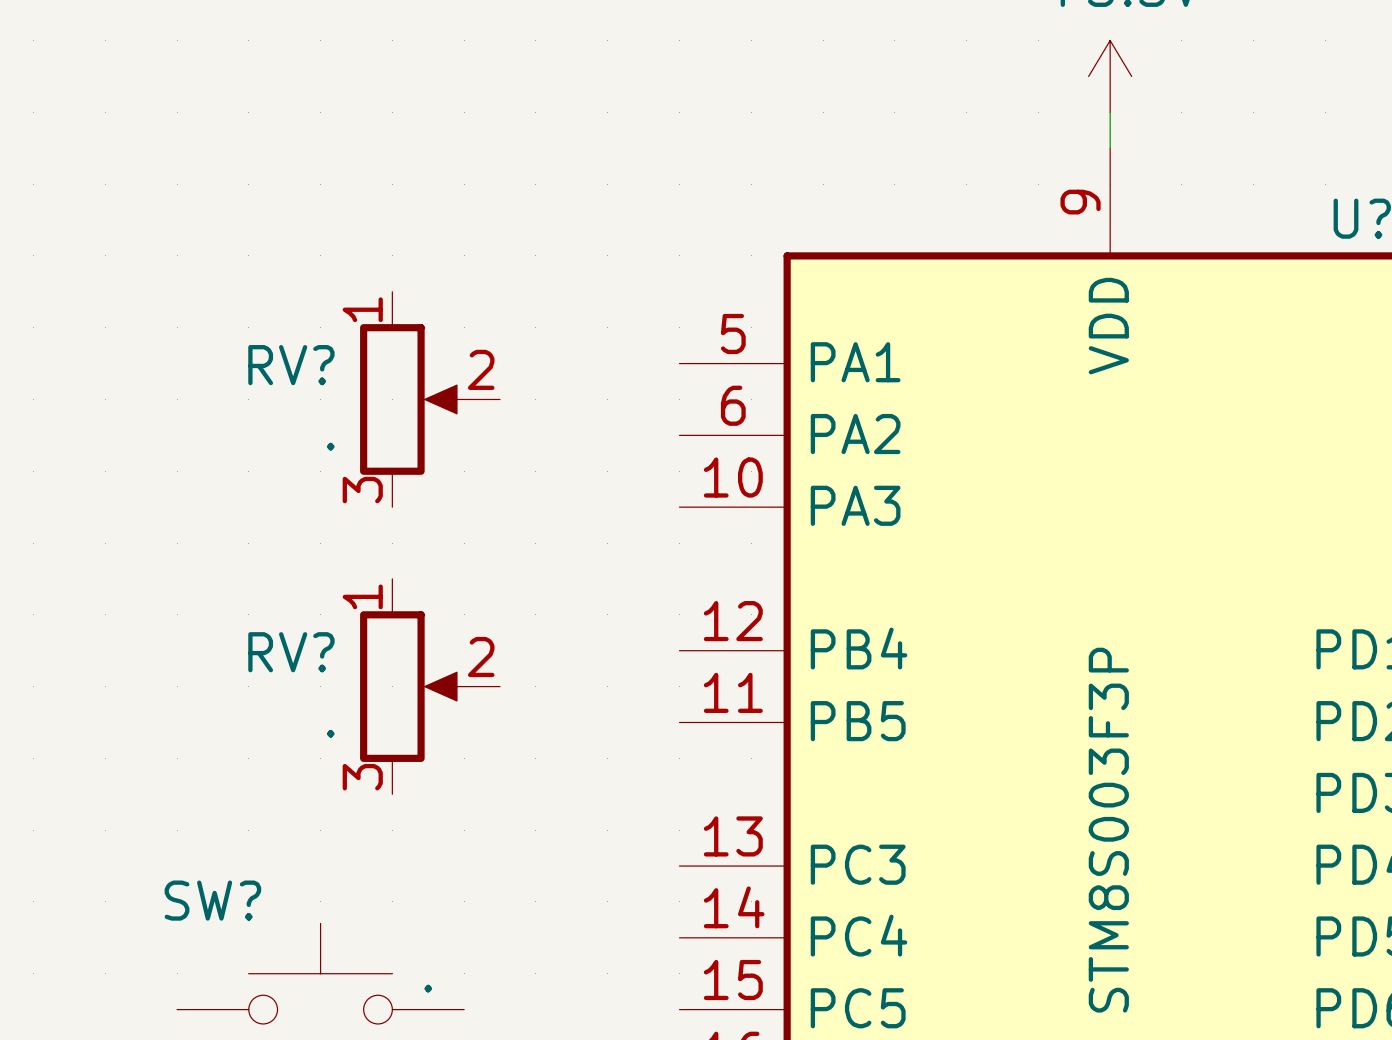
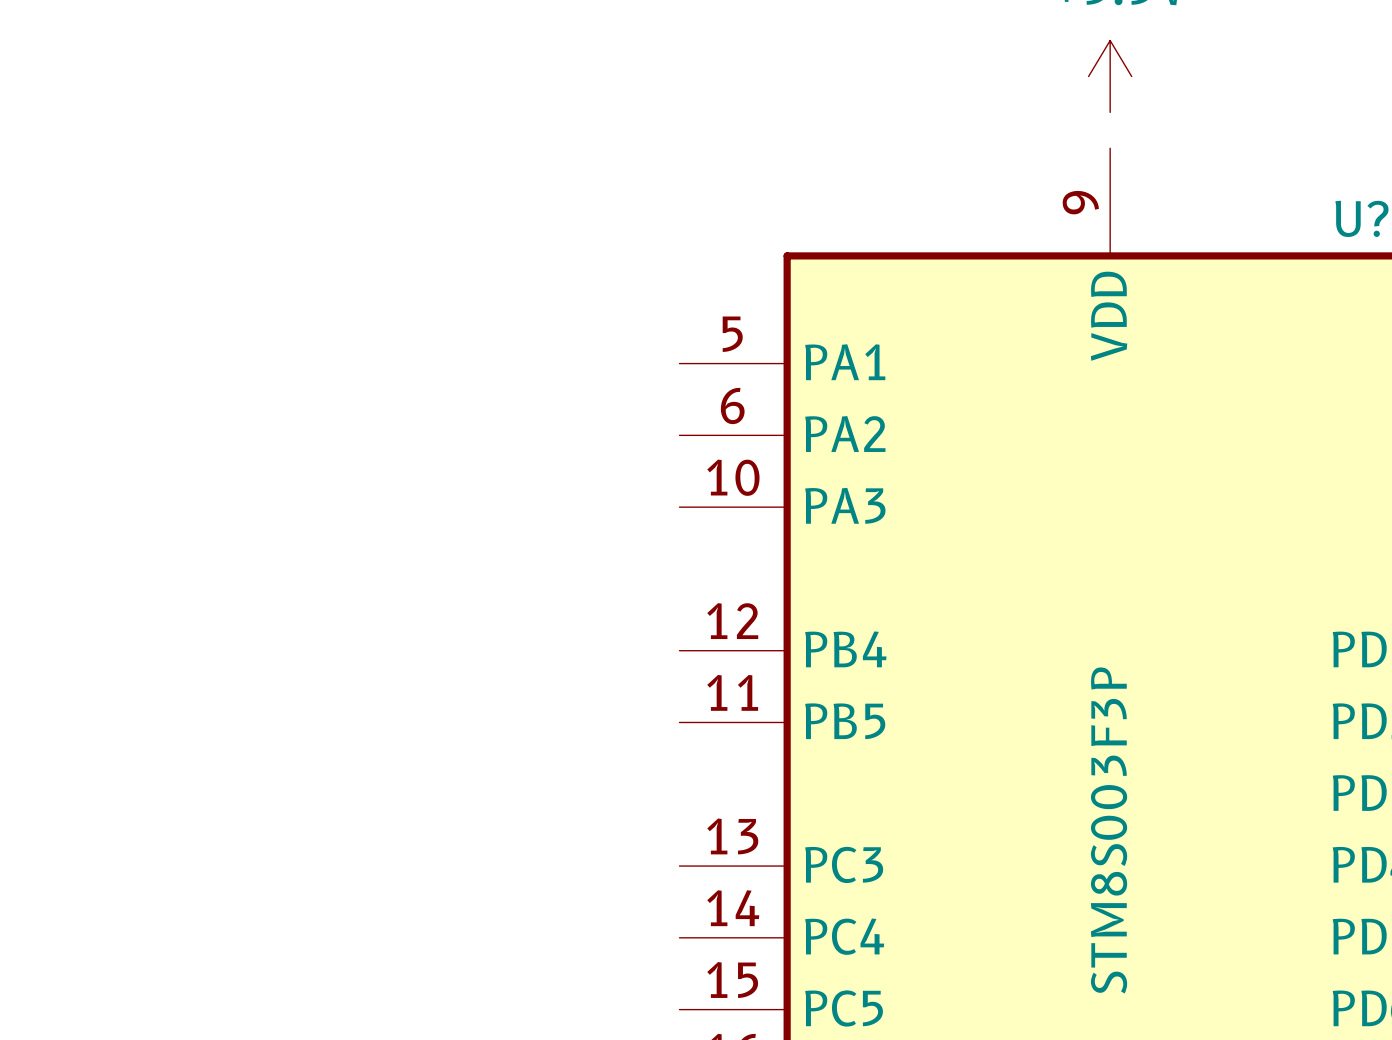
wire: (1110, 112) (1110, 148) -> none
RV?: . (430, 399) -> none
RV?: . (430, 686) -> none
SW?: . (320, 973) -> none

